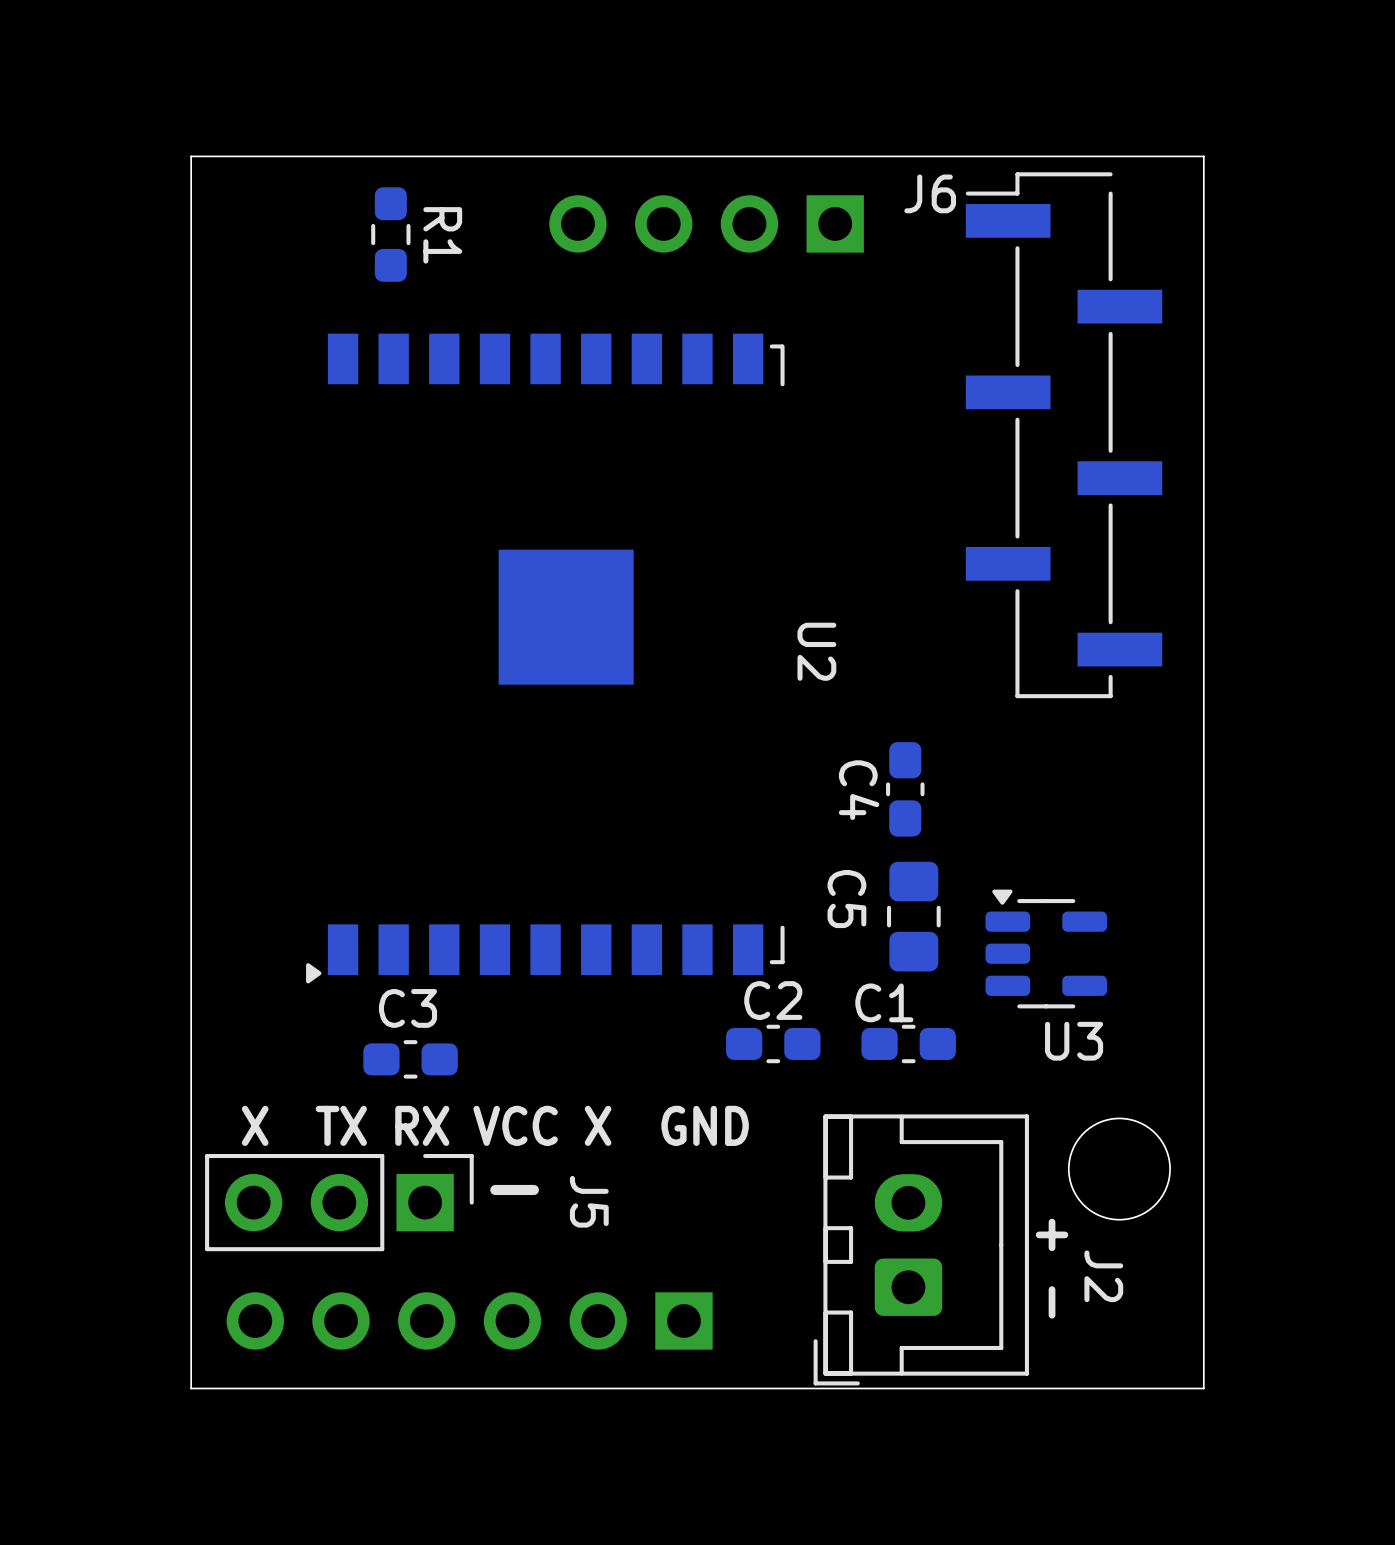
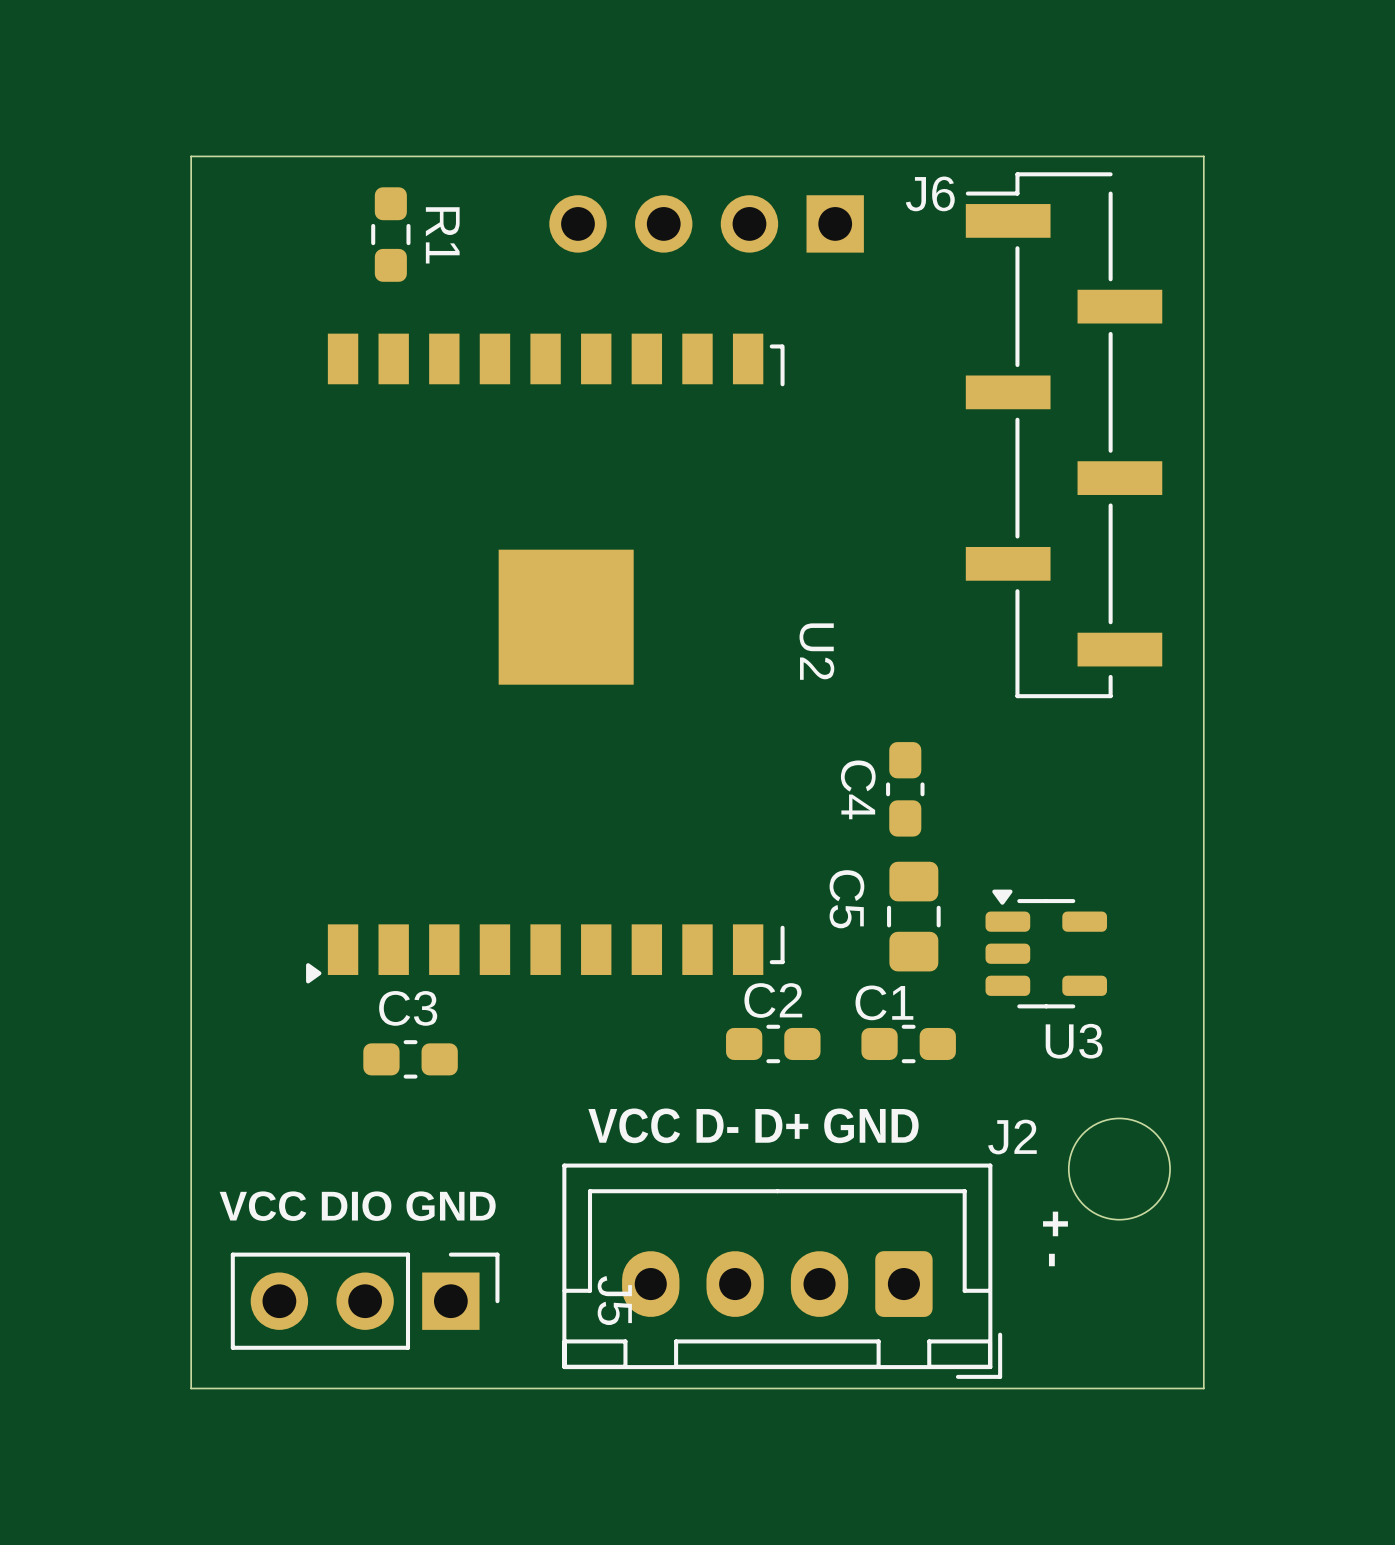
J2 footprint: [813, 1114, 1029, 1386] -> [562, 1163, 1003, 1379]
text: X TX RX VCC X GND (495, 1125) -> none
text: none -> VCC D- D+ GND (753, 1125)
text: - (514, 1189) -> none
J5 position: (339, 1202) -> (365, 1301)
text: none -> VCC DIO GND (357, 1206)
J2 name position: J2 (1103, 1276) -> J2 (1012, 1137)
part: (469, 1320) -> none

